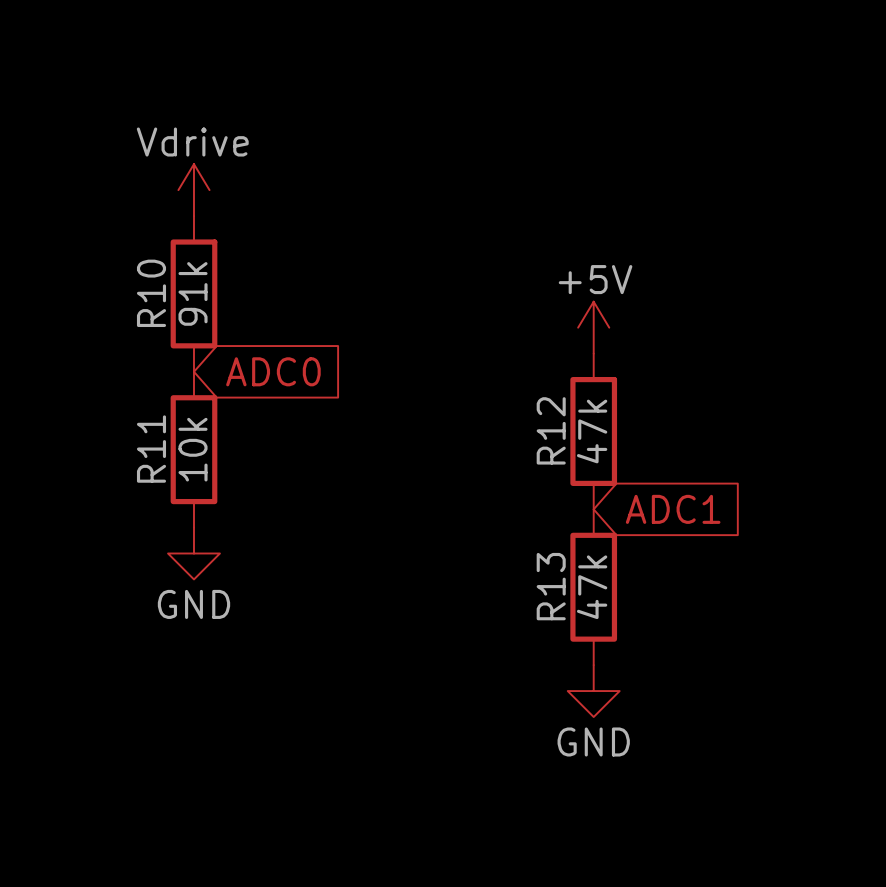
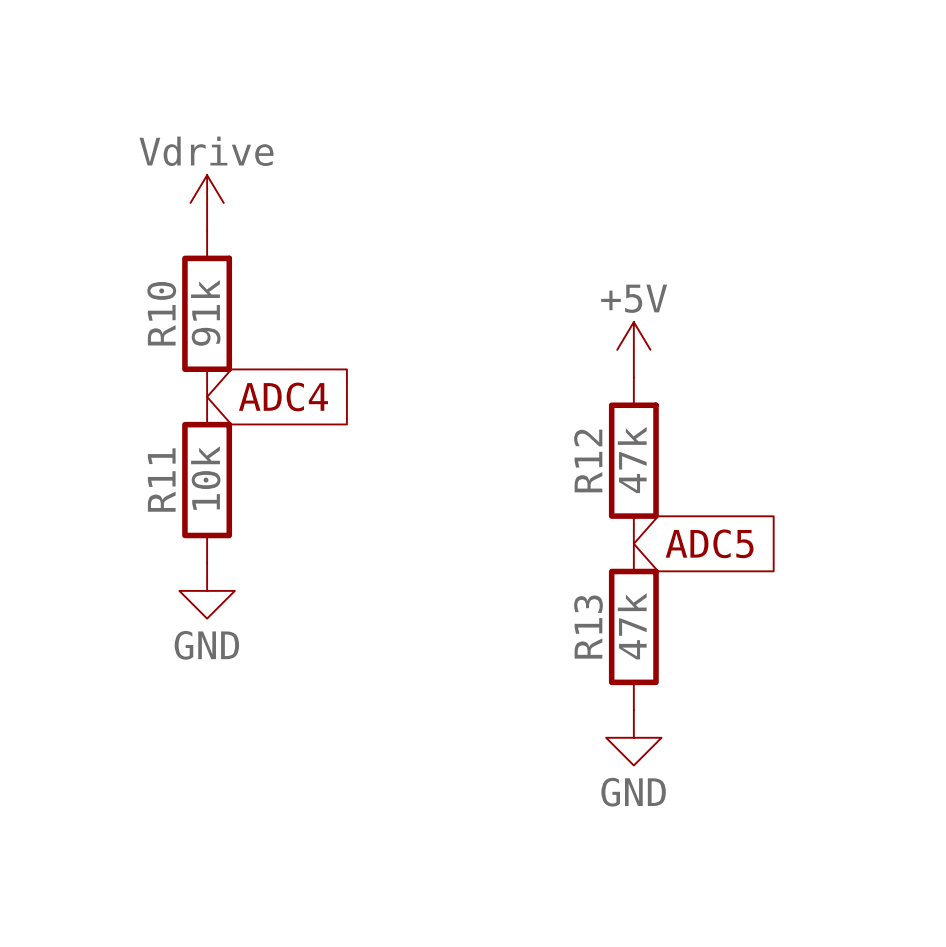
global label: ADC0 (273, 371) -> ADC4 (283, 396)
global label: ADC1 (673, 509) -> ADC5 (709, 543)

